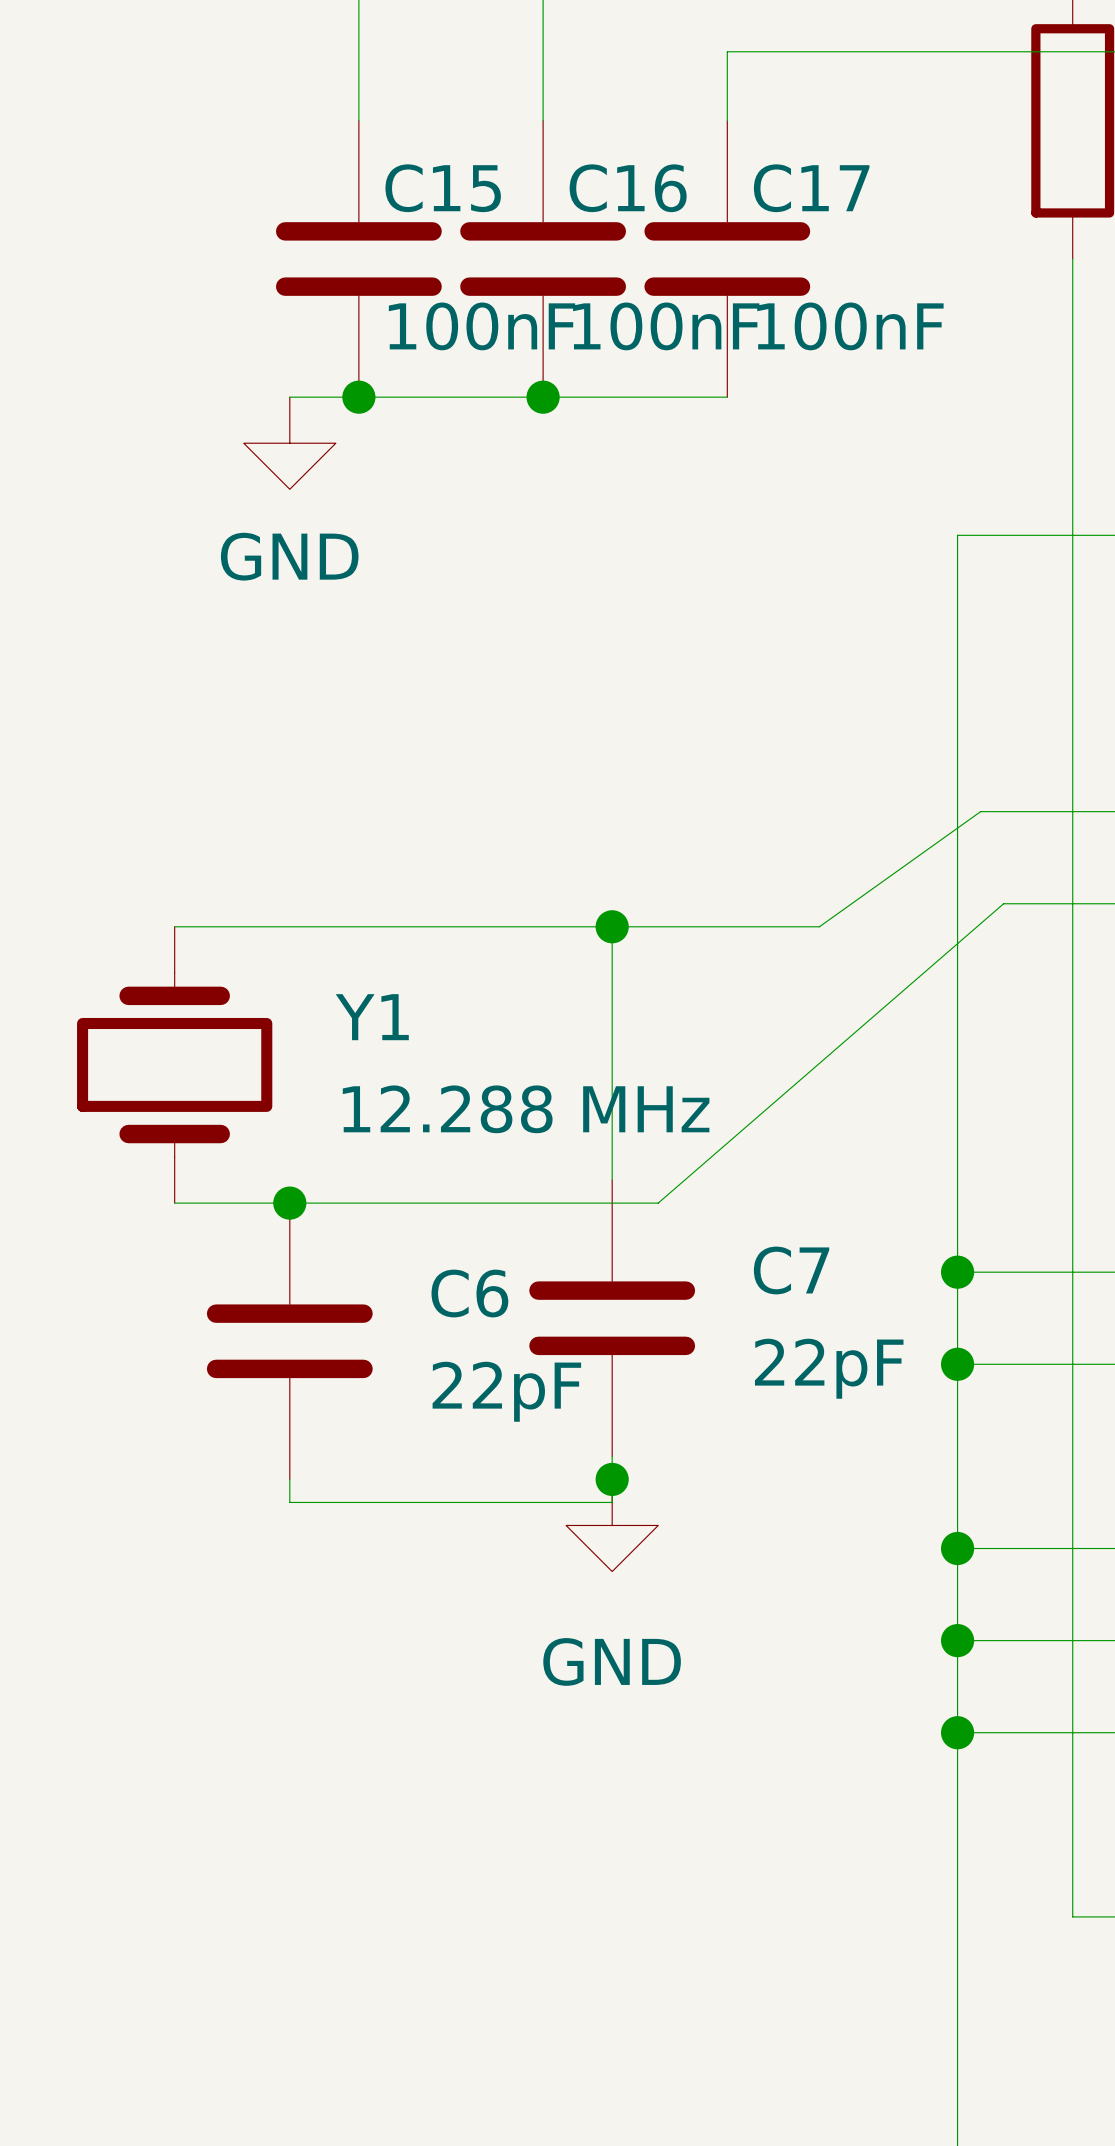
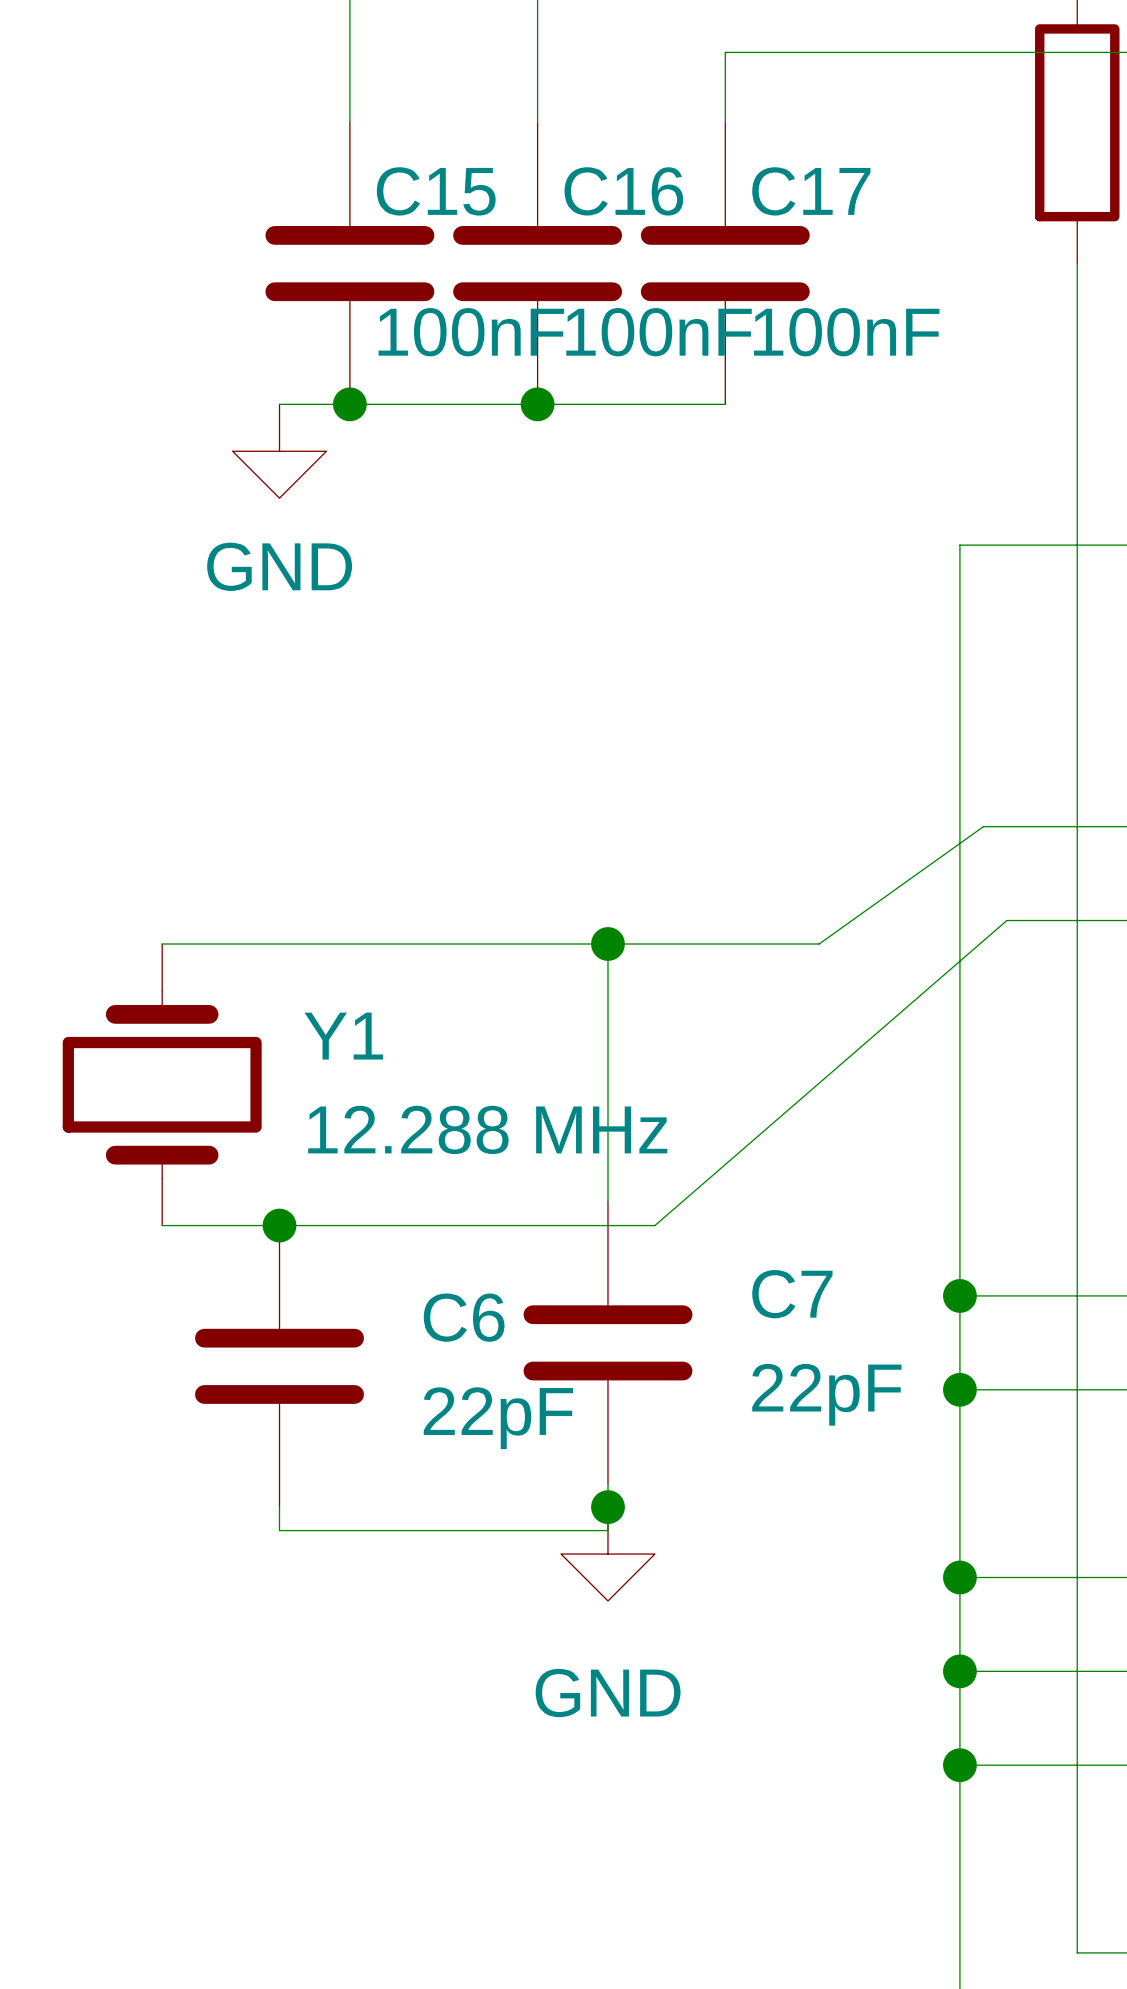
Y1 name position: Y1 (372, 1017) -> Y1 (343, 1036)
Y1 value position: 12.288 MHz (526, 1109) -> 12.288 MHz (487, 1129)

